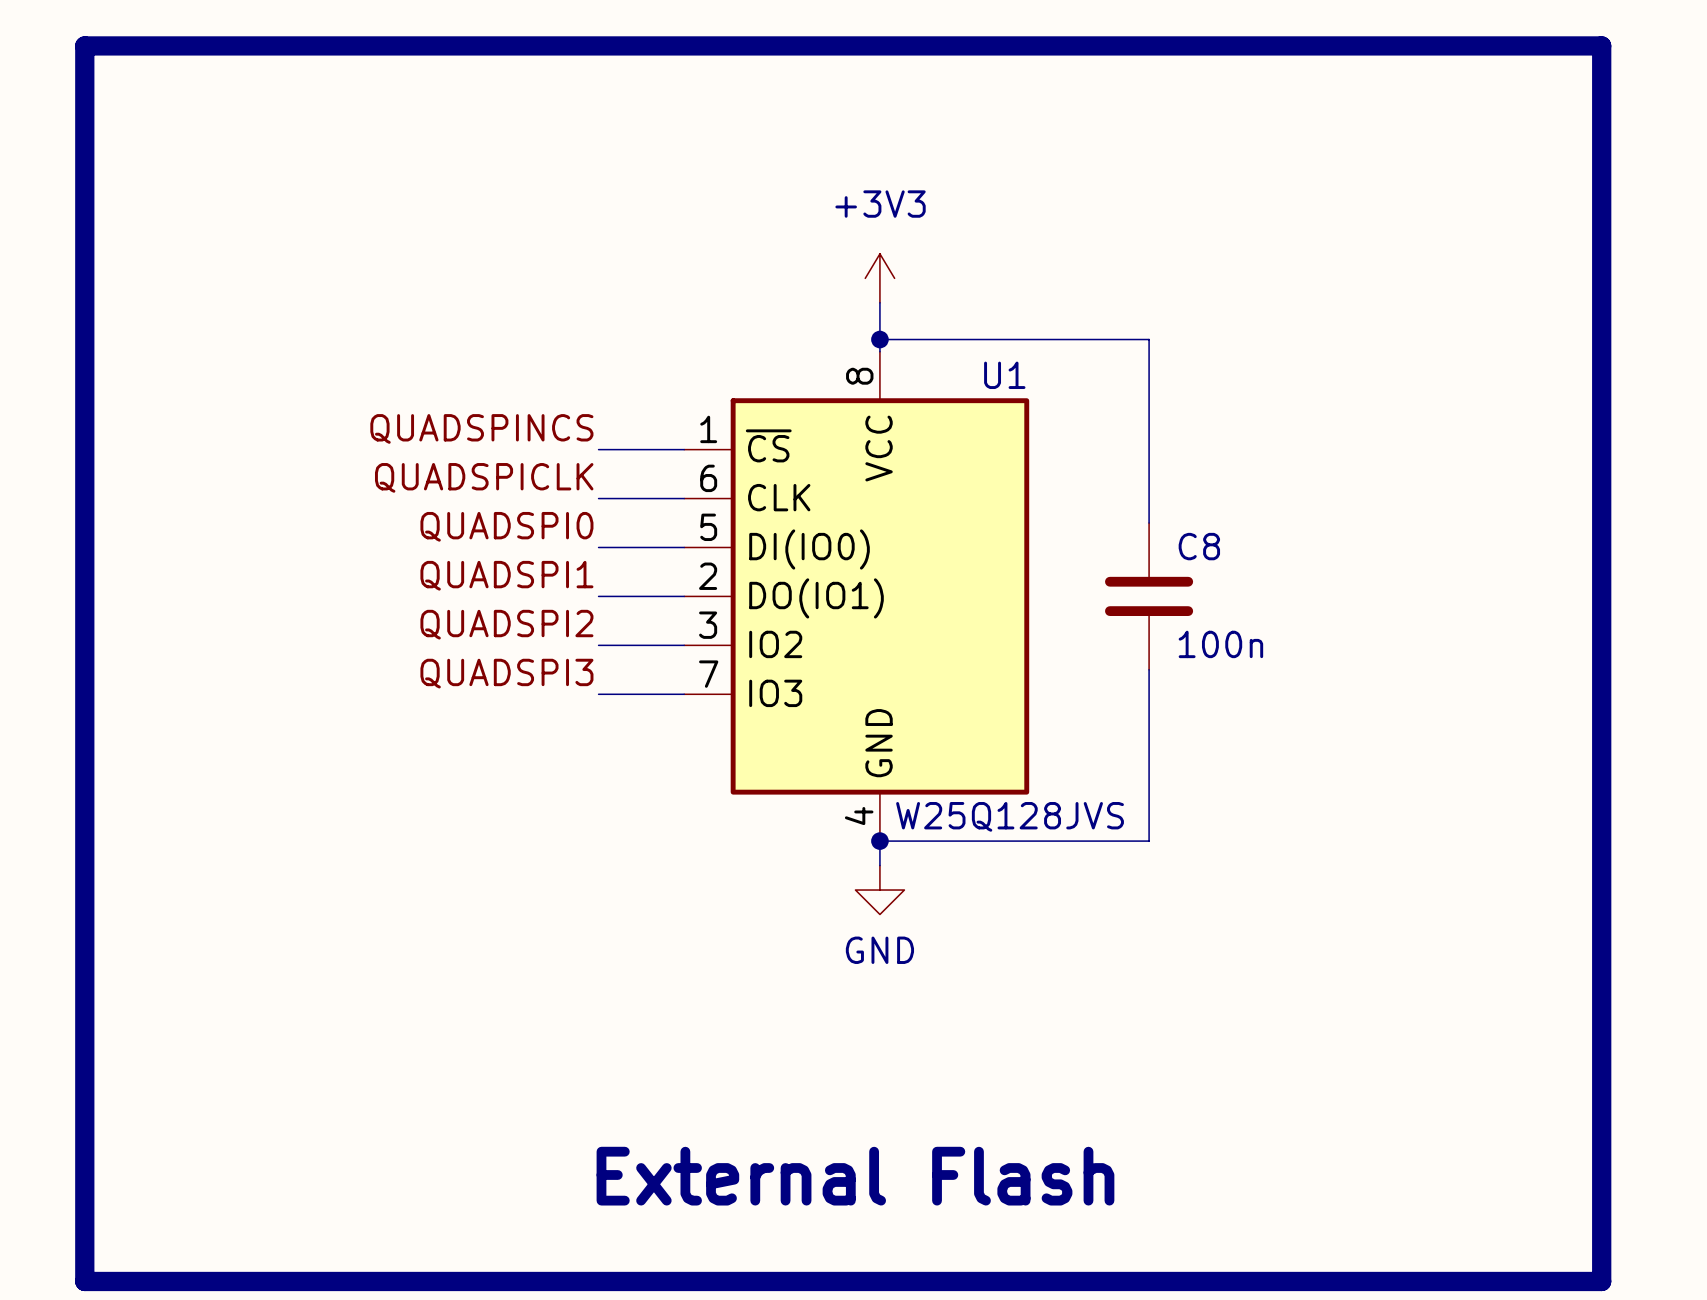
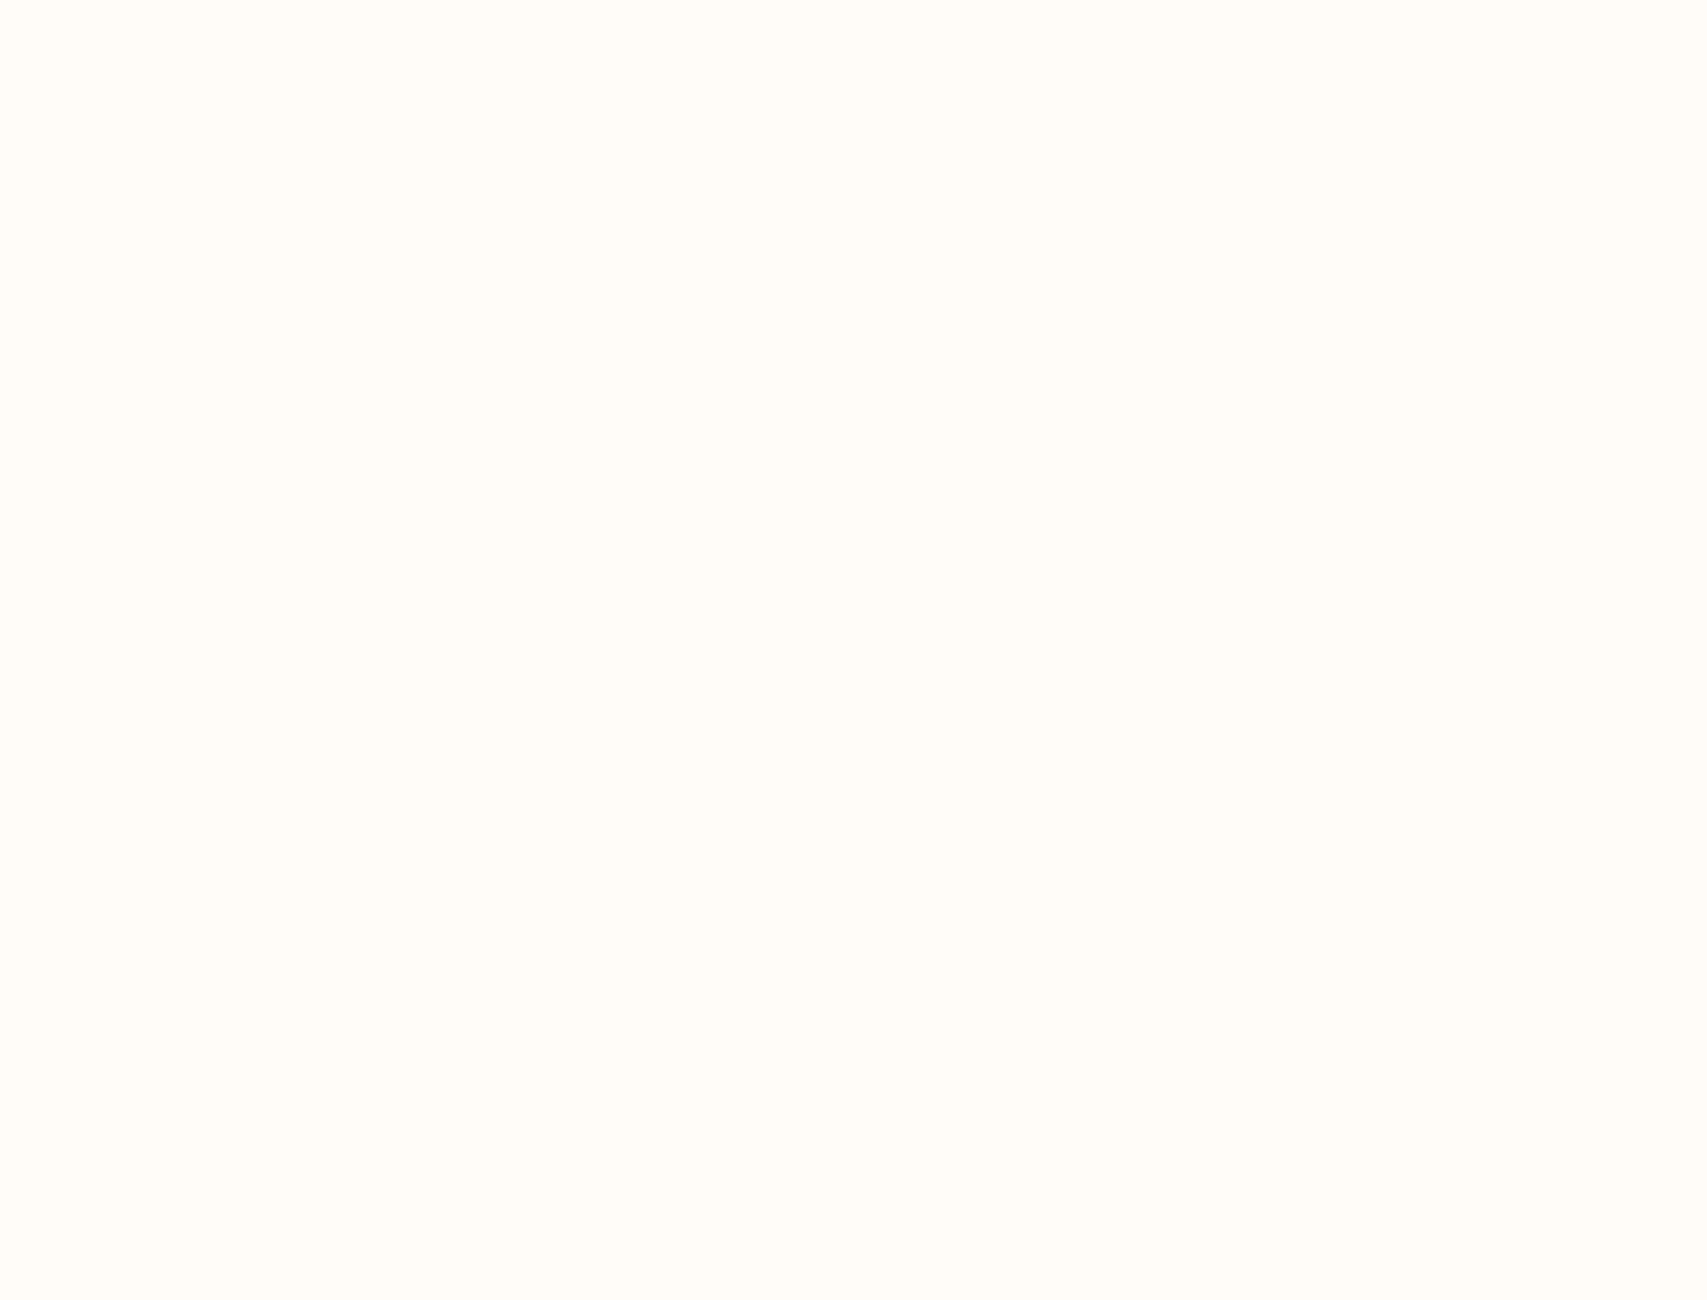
line: (84, 45) (1601, 45) (1601, 1281) (84, 1281) (84, 45) -> none
power symbol: +3V3 (879, 278) -> none
wire: (879, 302) (879, 351) -> none
wire: (879, 339) (1149, 339) (1149, 523) -> none
junction: (879, 339) -> none
label: QUADSPINCS (481, 428) -> none
wire: (598, 449) (684, 449) -> none
label: QUADSPICLK (484, 477) -> none
wire: (598, 498) (684, 498) -> none
label: QUADSPI0 (506, 526) -> none
wire: (598, 547) (684, 547) -> none
label: QUADSPI1 (506, 575) -> none
wire: (598, 596) (684, 596) -> none
U1: W25Q128JVS (856, 596) -> none
C8: 100n (1149, 596) -> none
label: QUADSPI2 (506, 624) -> none
wire: (598, 645) (684, 645) -> none
wire: (1149, 669) (1149, 841) (879, 841) (879, 865) -> none
label: QUADSPI3 (506, 673) -> none
wire: (598, 694) (684, 694) -> none
junction: (879, 841) -> none
power symbol: GND (879, 890) -> none
text: External Flash (855, 1176) -> none

